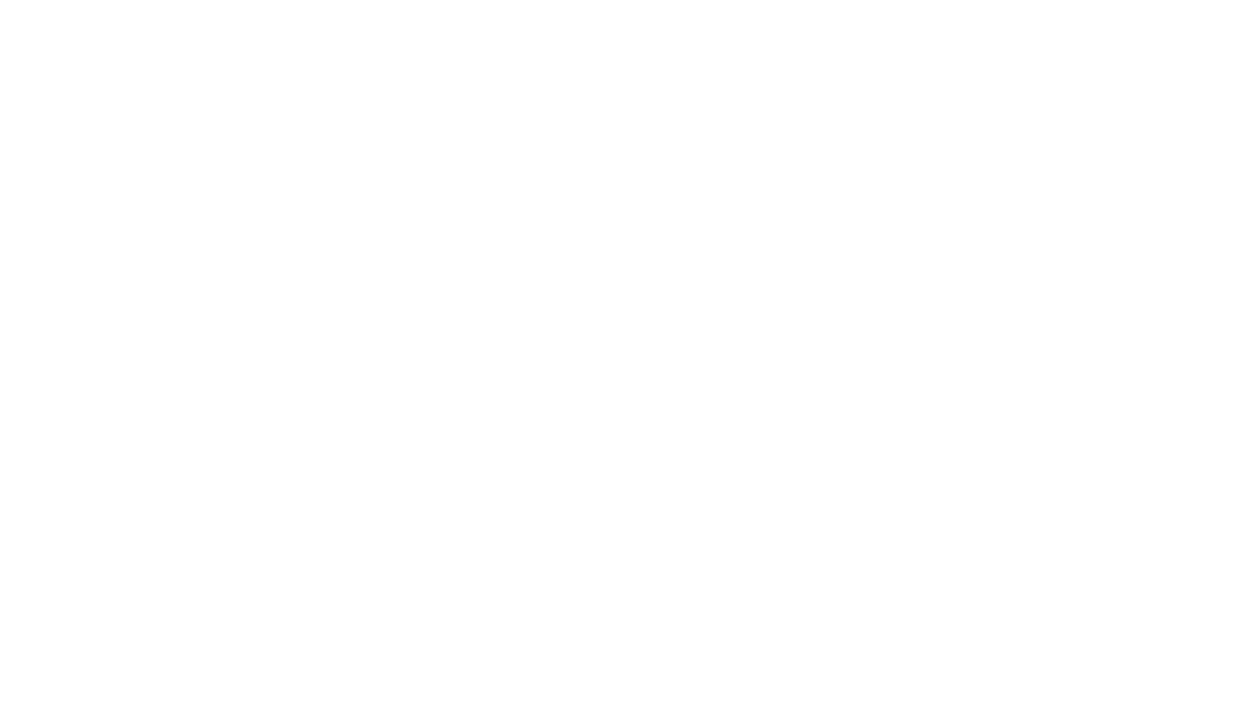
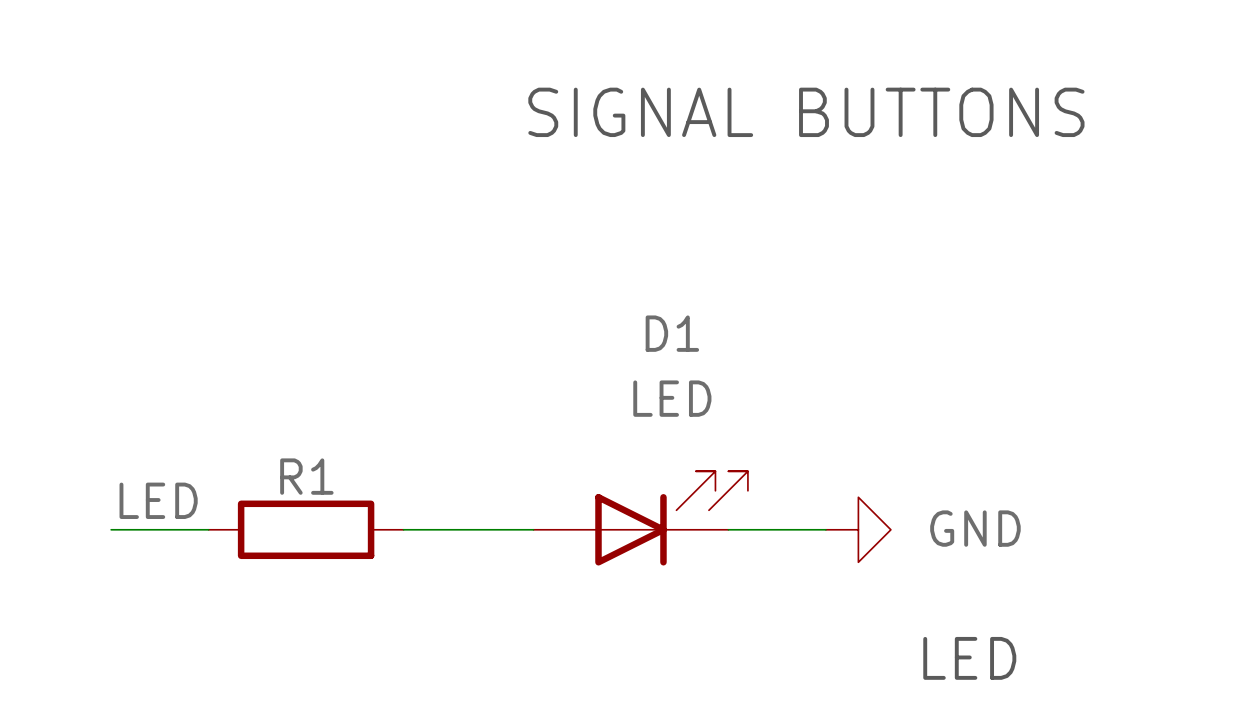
text: none -> SIGNAL BUTTONS (806, 112)
label: none -> LED (158, 500)
D1: none -> LED (640, 518)
wire: none -> (111, 529) (208, 529)
R1: none -> (306, 529)
wire: none -> (403, 529) (533, 529)
wire: none -> (728, 529) (825, 529)
power symbol: none -> GND (858, 529)
text: none -> LED (969, 658)

